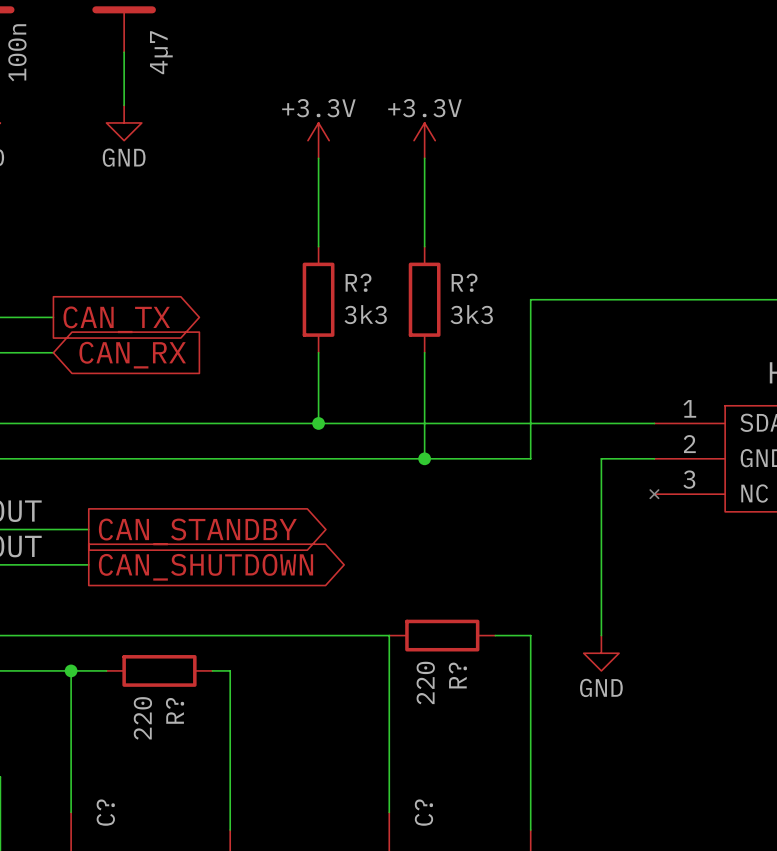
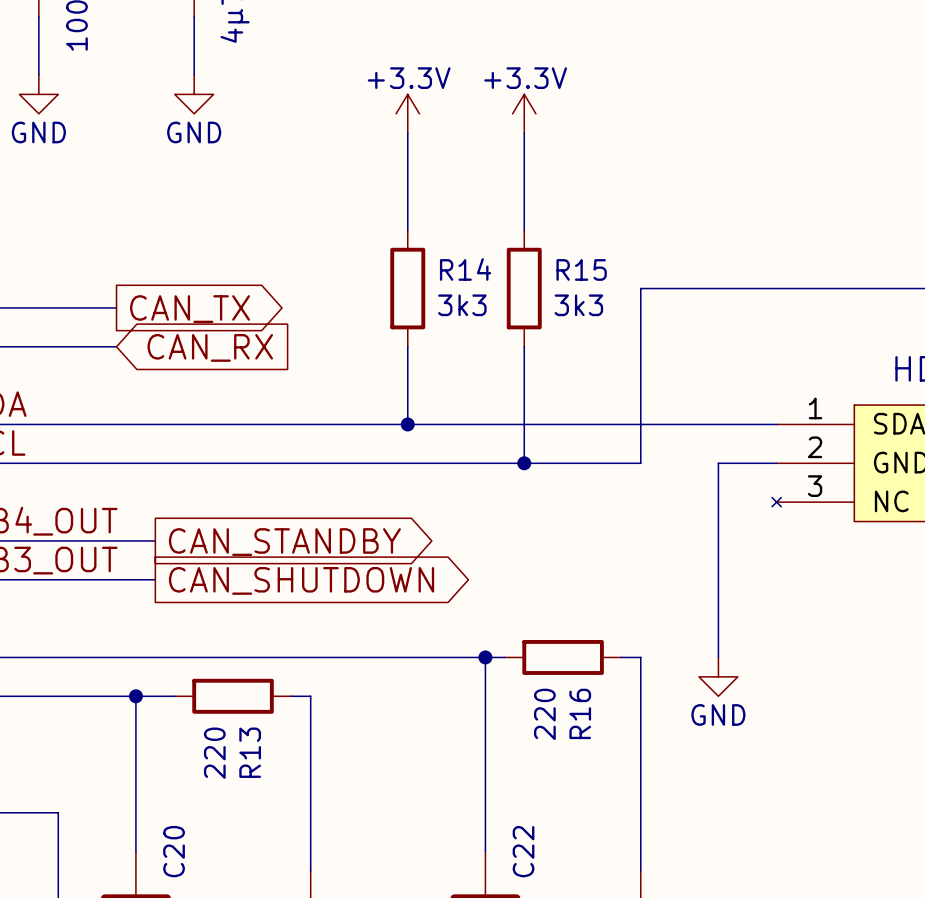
R? name: R? (358, 282) -> R14 (465, 269)
R? name: R? (464, 282) -> R15 (581, 269)
junction: none -> (485, 657)
R?: 220 (442, 635) -> none
R16: none -> 220 (563, 657)
R? name: R? (175, 710) -> R13 (250, 752)
C? name: C? (105, 812) -> C20 (174, 851)
C? name: C? (423, 812) -> C22 (523, 851)

